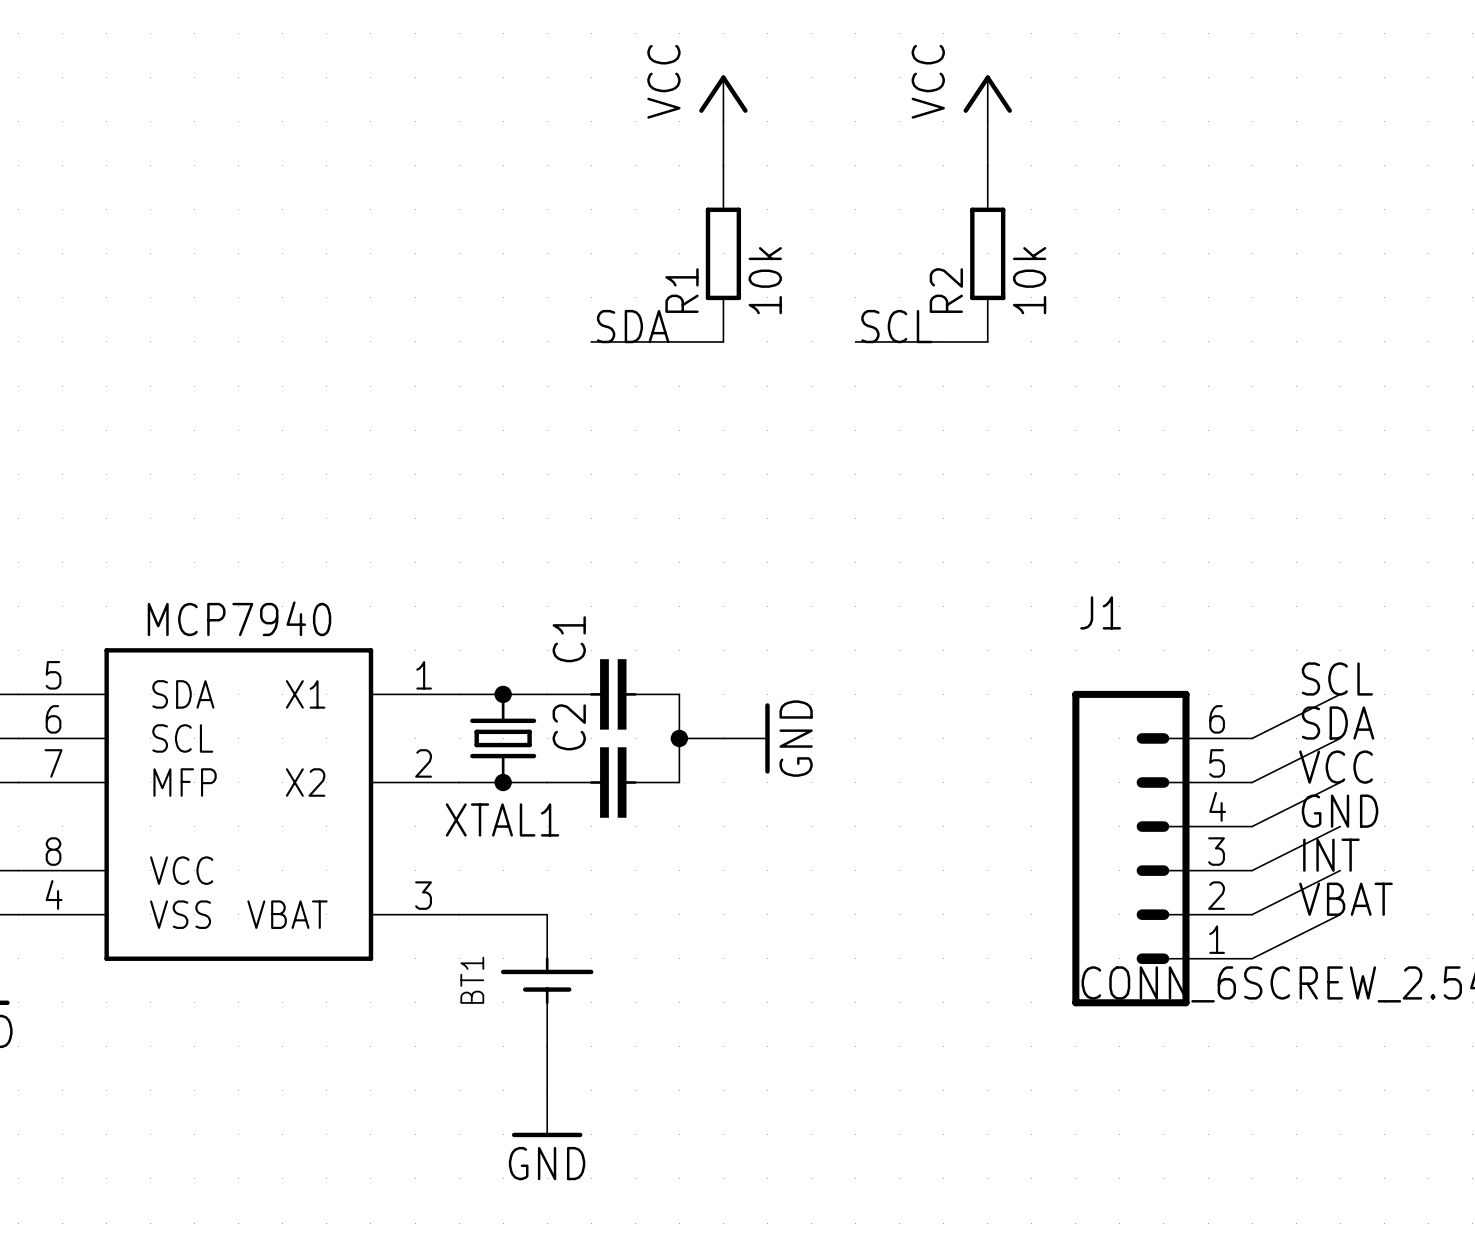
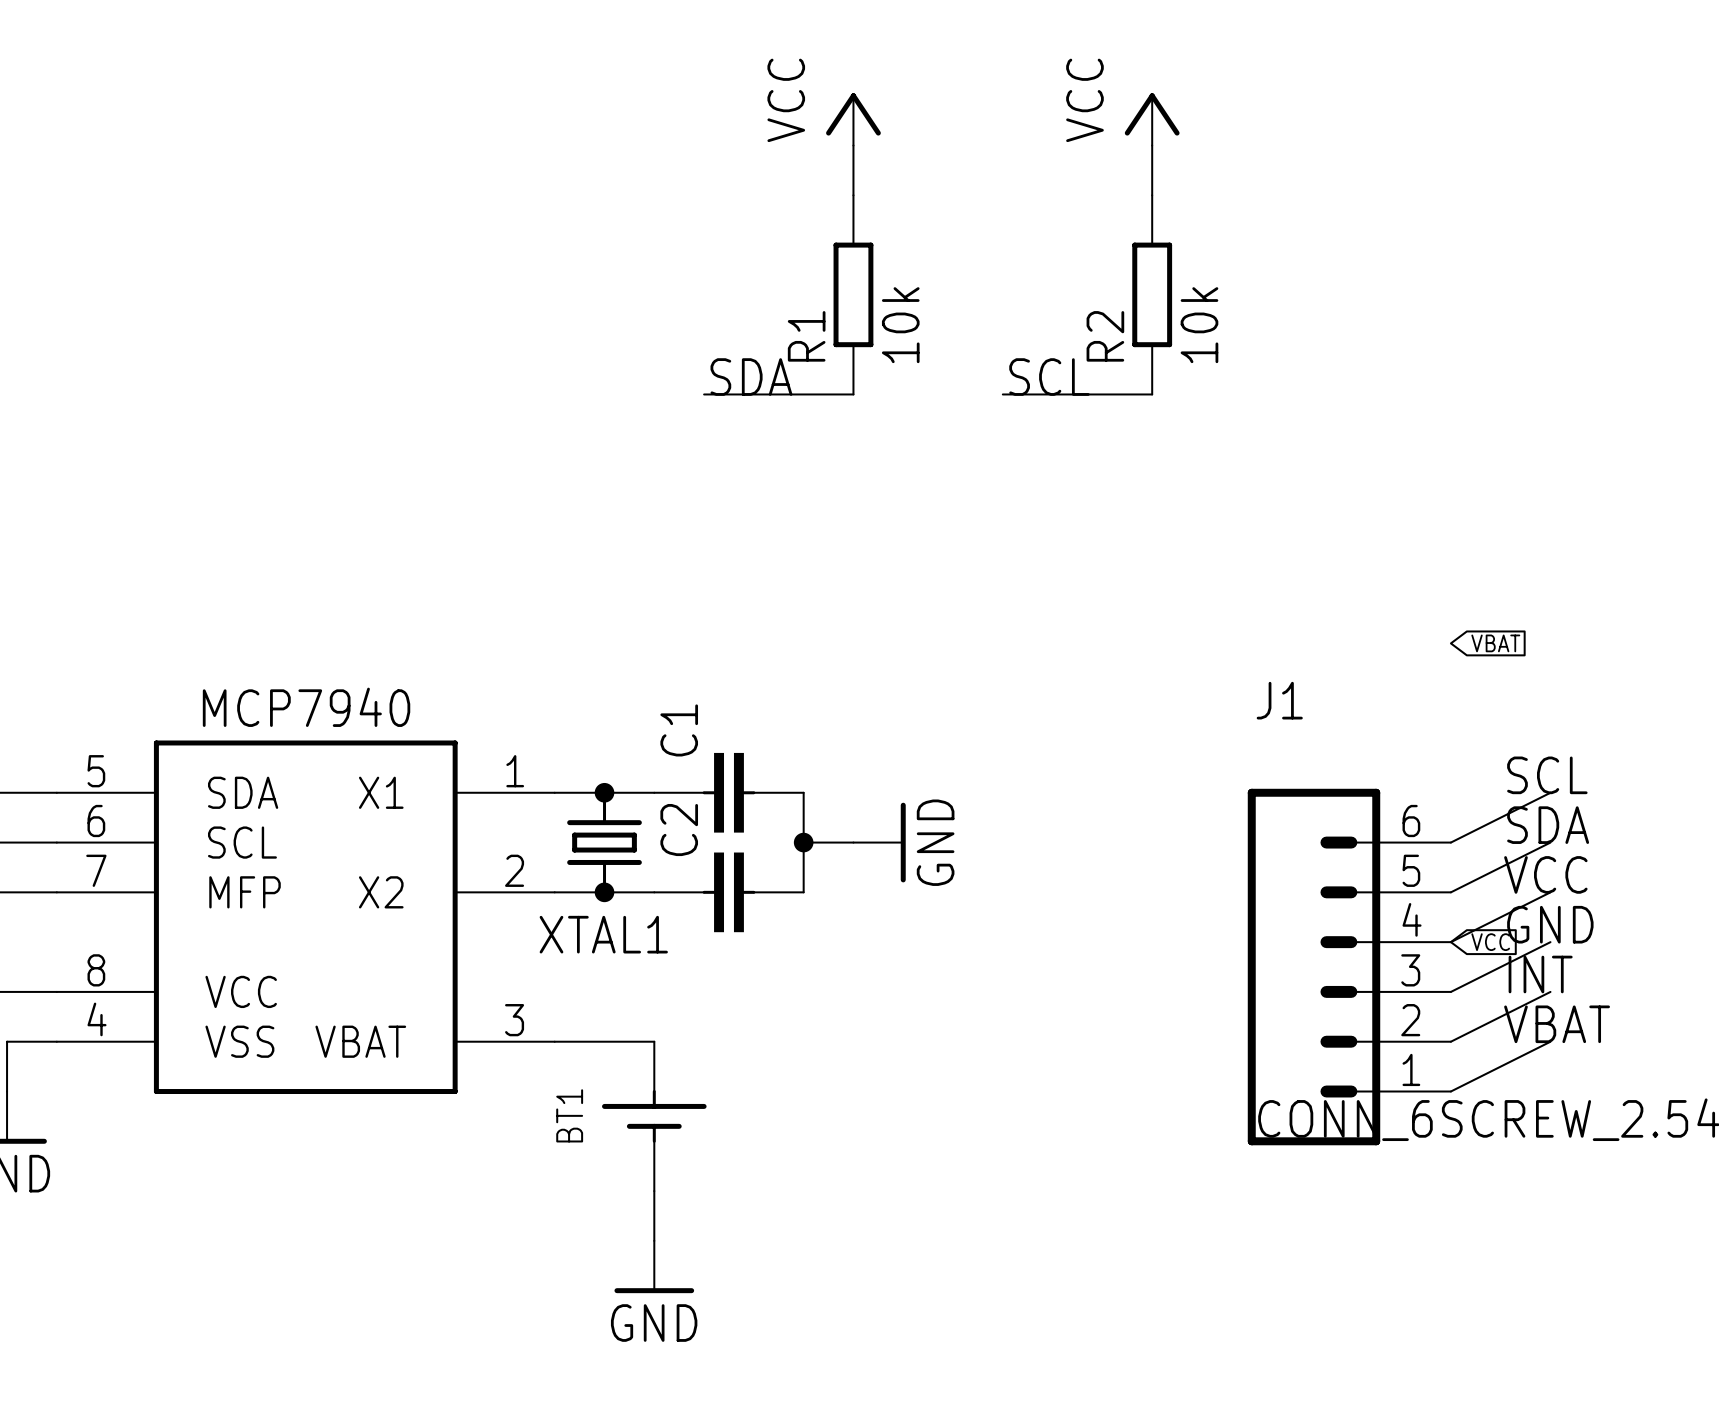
global label: none -> VBAT (1495, 643)
global label: none -> VCC (1490, 942)

